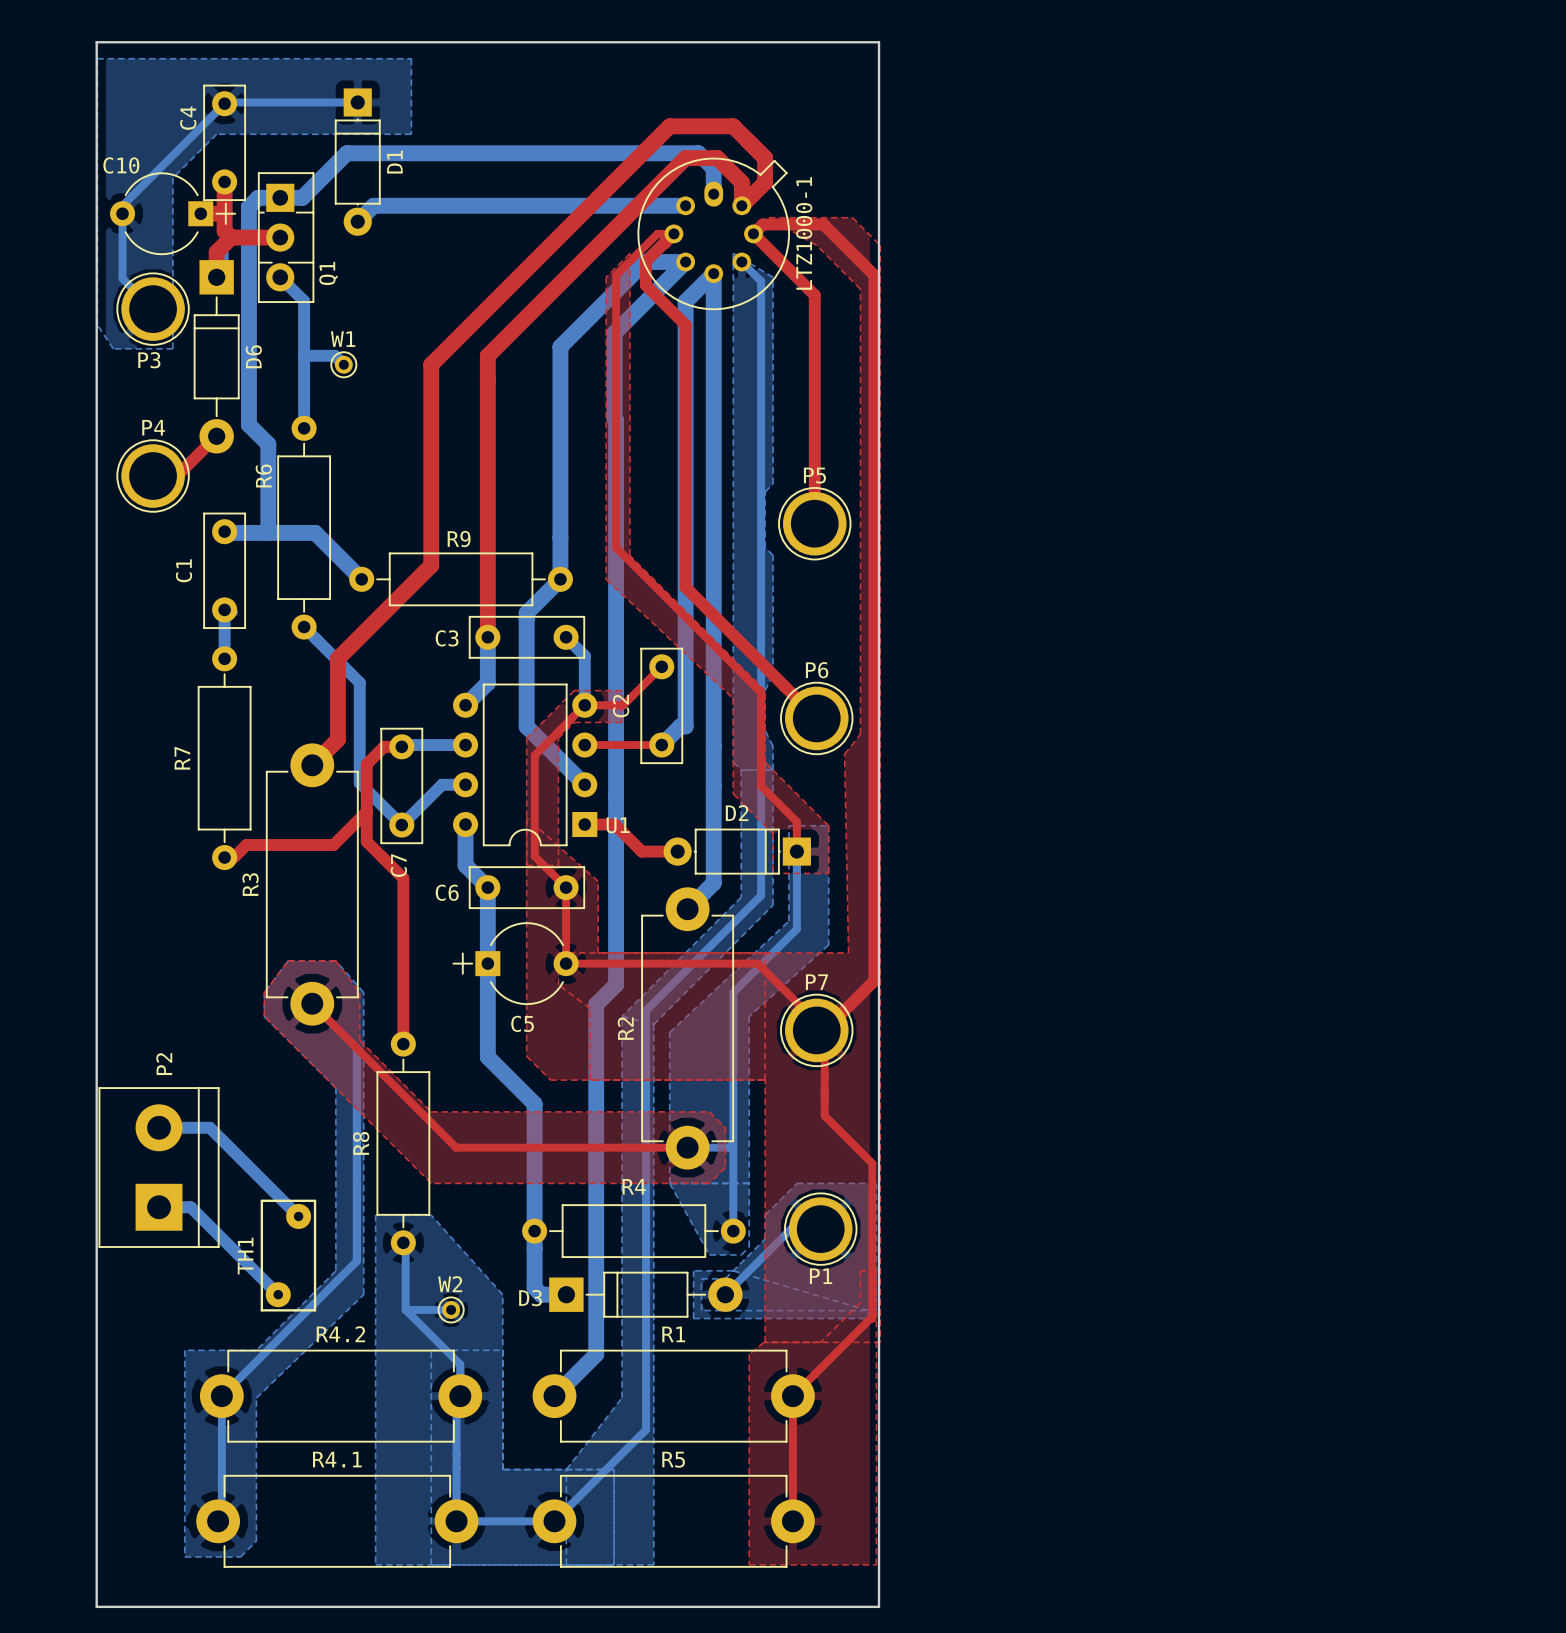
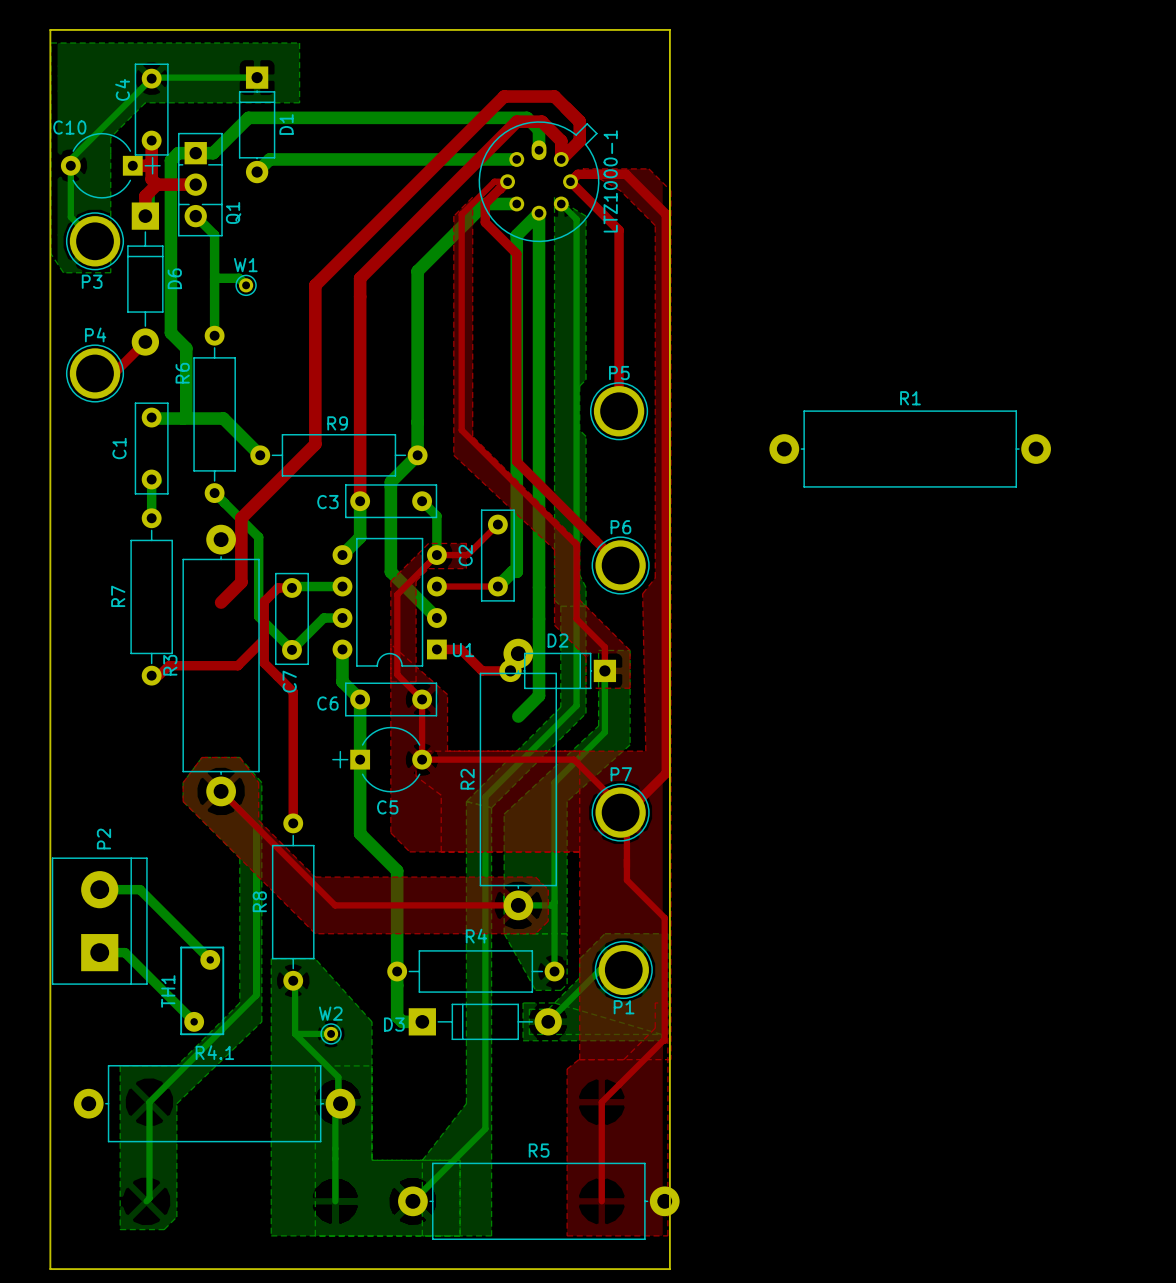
bottom track: (685, 261) (614, 332) (616, 984) (596, 1004) (596, 1354) (554, 1396) -> none
R3 footprint: [265, 743, 359, 1026] -> [182, 524, 260, 807]
R2 footprint: [641, 887, 735, 1170] -> [479, 638, 558, 921]
R1 footprint: [532, 1349, 815, 1443] -> [769, 410, 1051, 488]
R4.2: (341, 1396) -> none
R4.1 footprint: [196, 1474, 479, 1568] -> [73, 1065, 356, 1143]
R5 footprint: [532, 1474, 815, 1568] -> [398, 1162, 680, 1240]
bottom track: (456, 1521) (554, 1521) -> none

